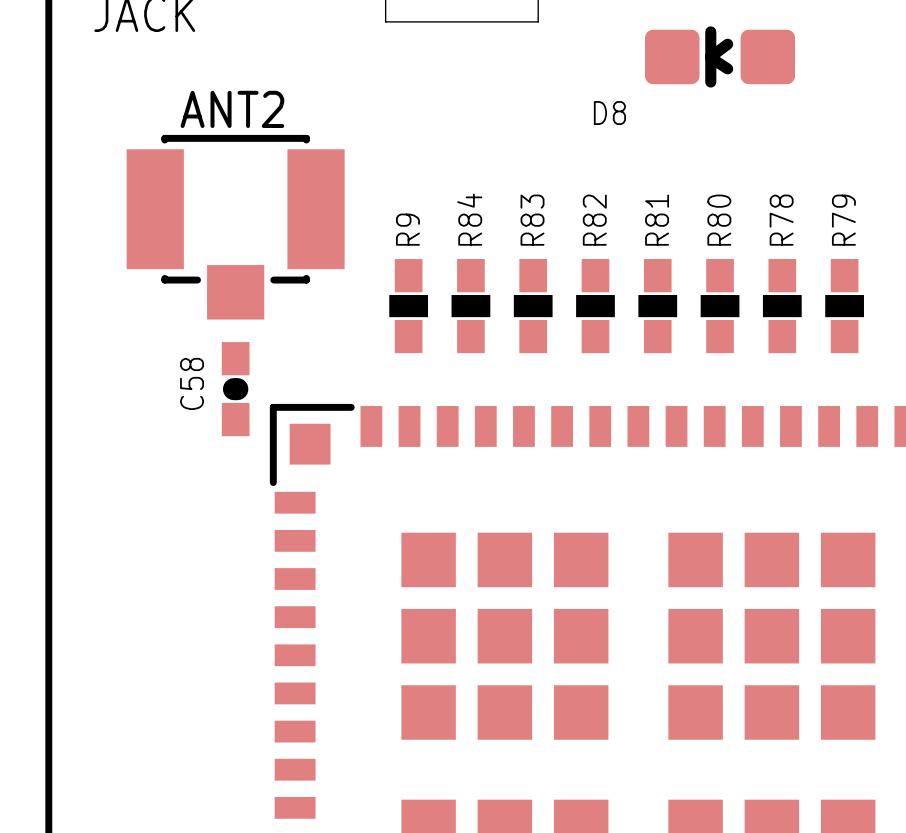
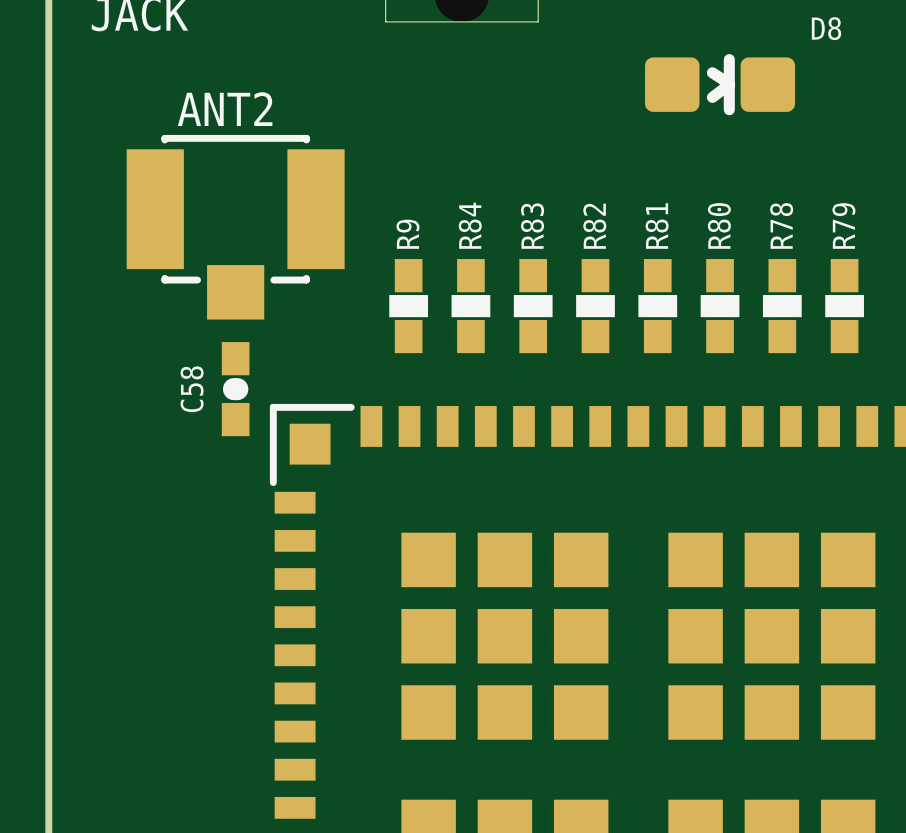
D8 rotation: 0° (720, 56) -> 180° (720, 84)

